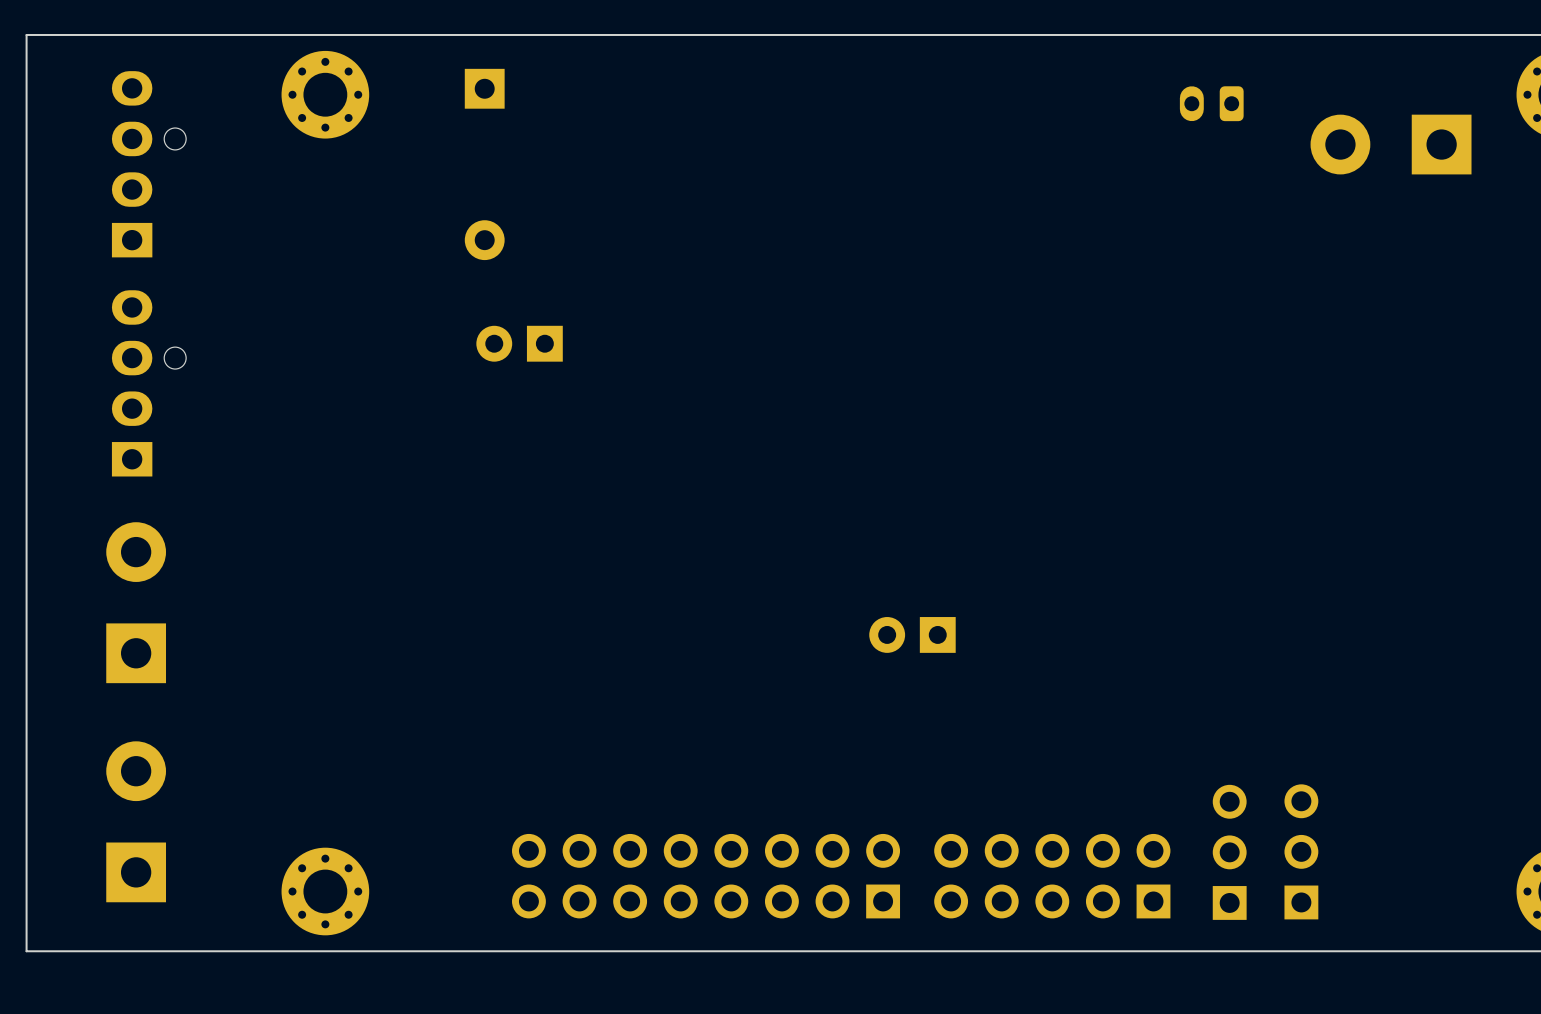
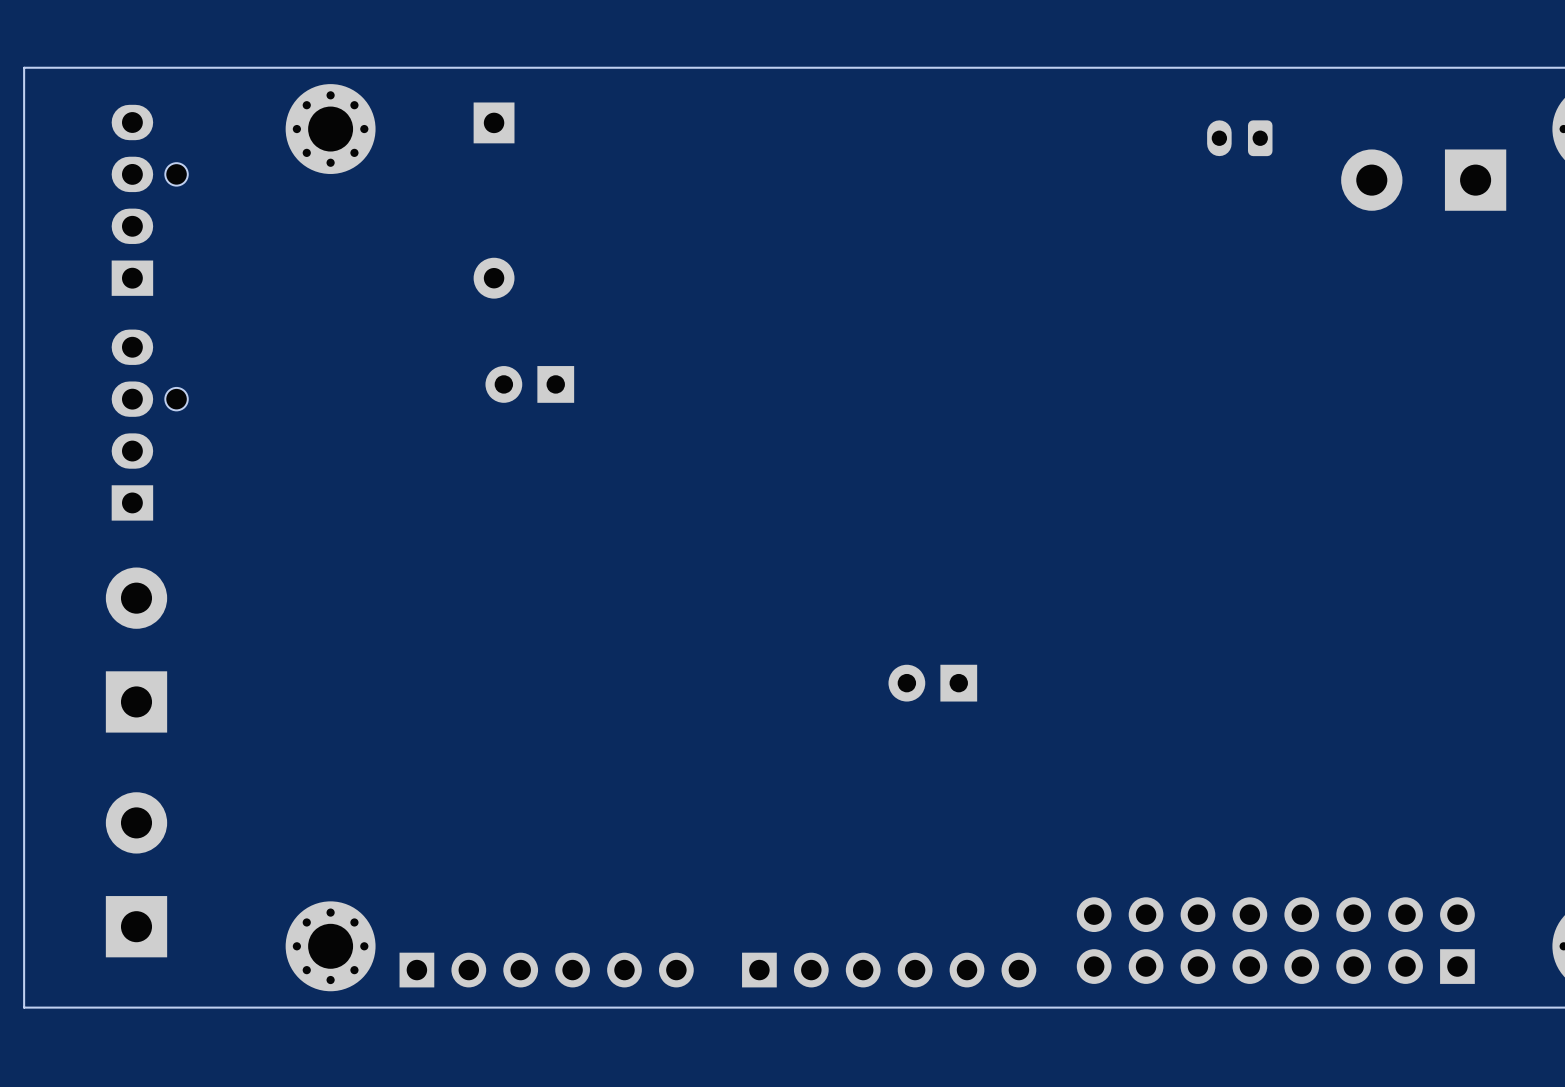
part: (1301, 851) -> none
part: (1229, 852) -> none
part: (706, 876) -> none
part: (1052, 876) -> none
part: none -> (1275, 940)
part: none -> (546, 970)
part: none -> (889, 970)

